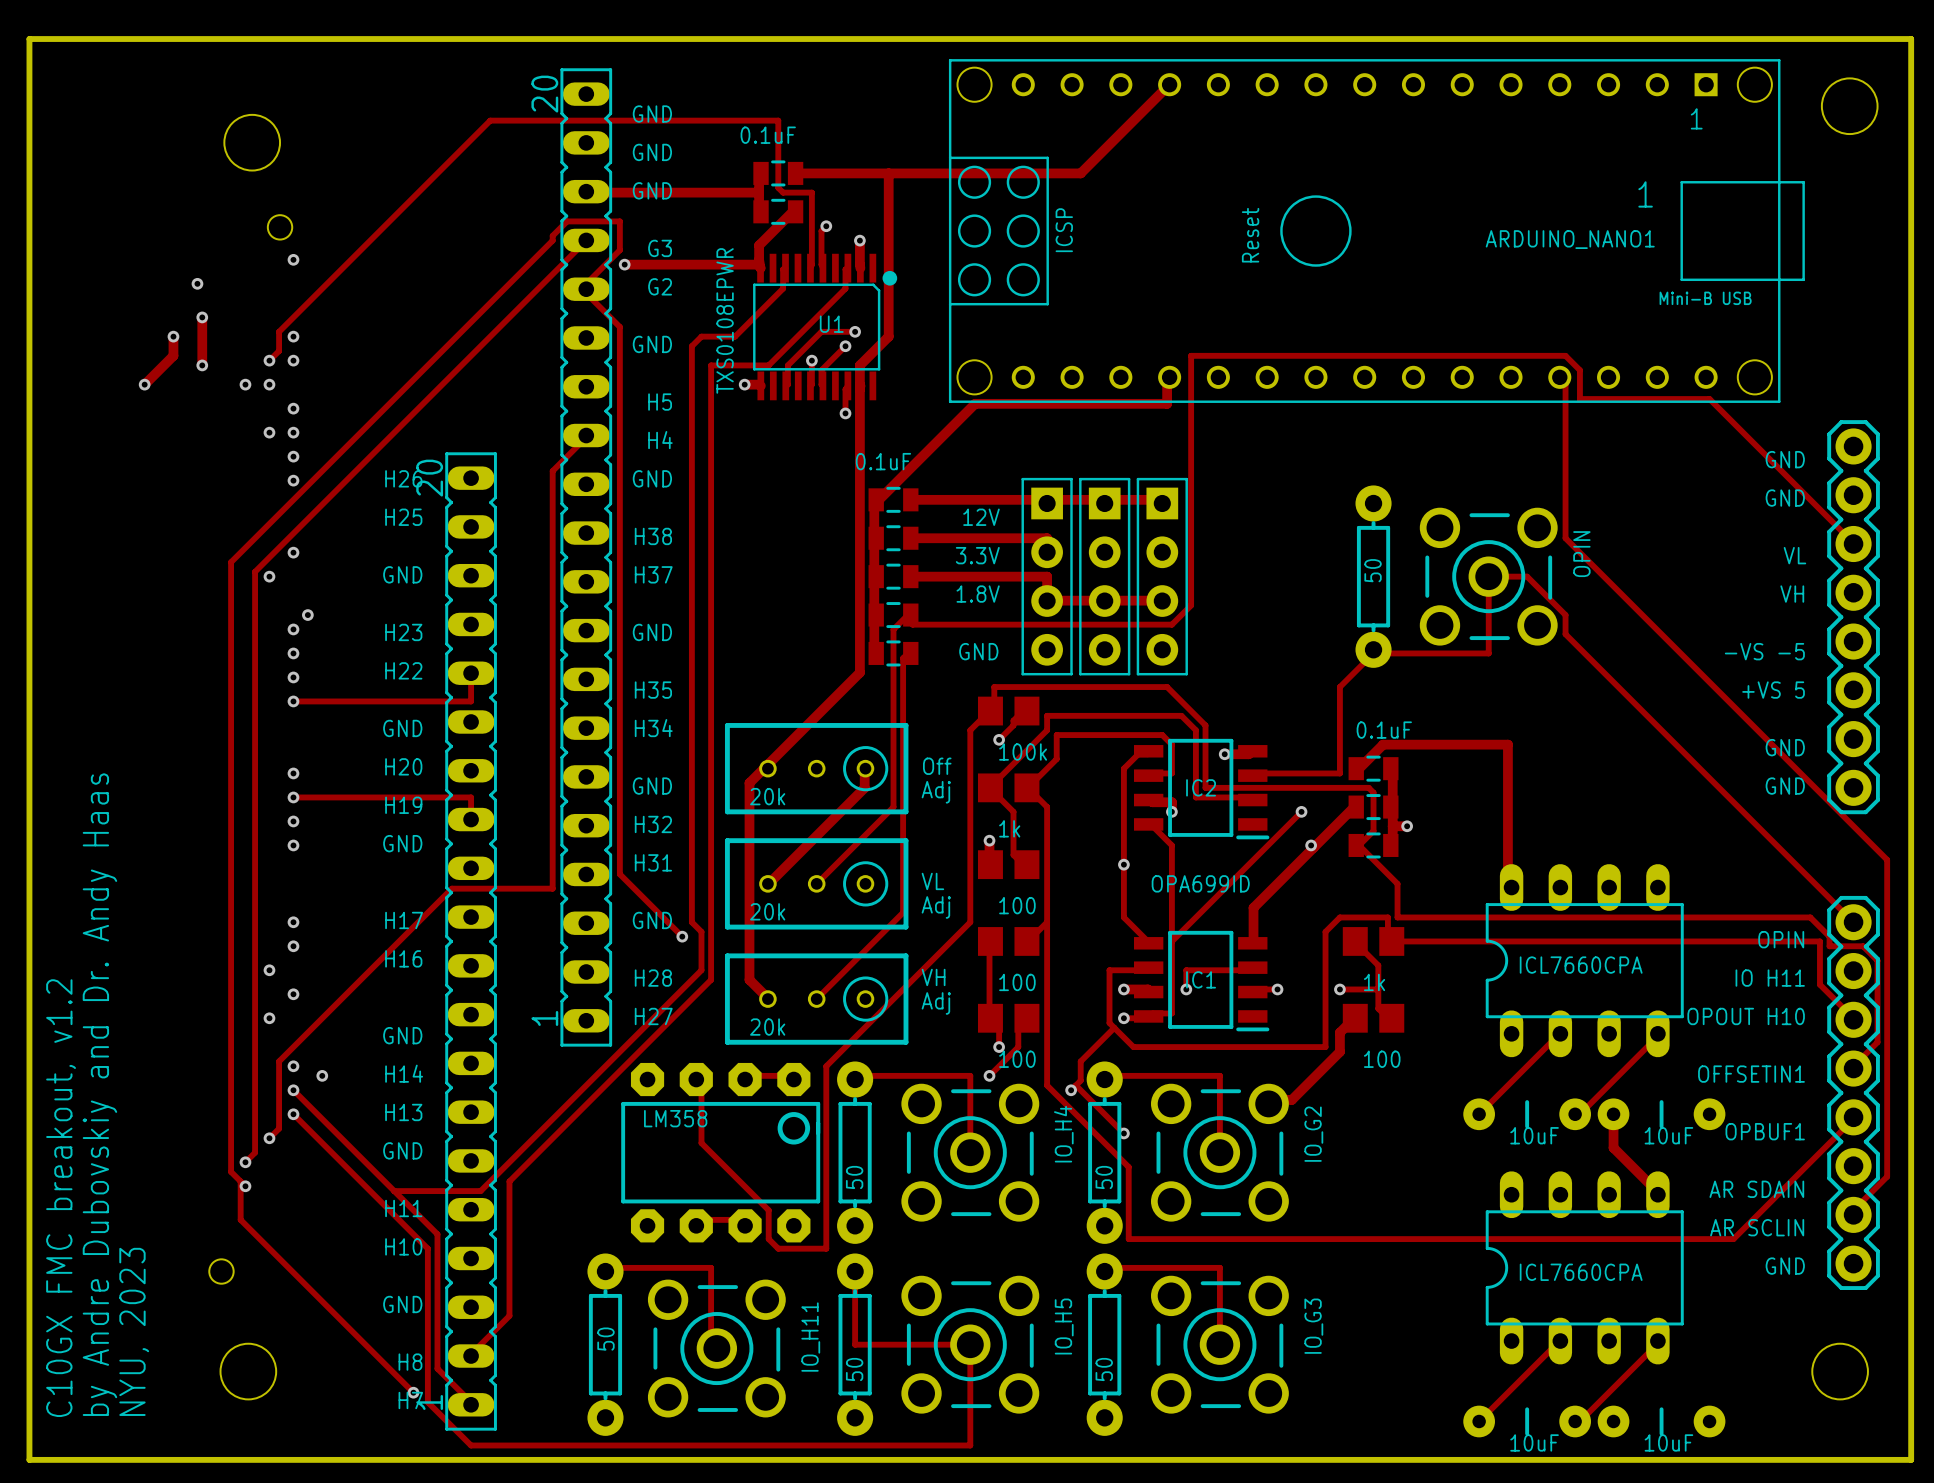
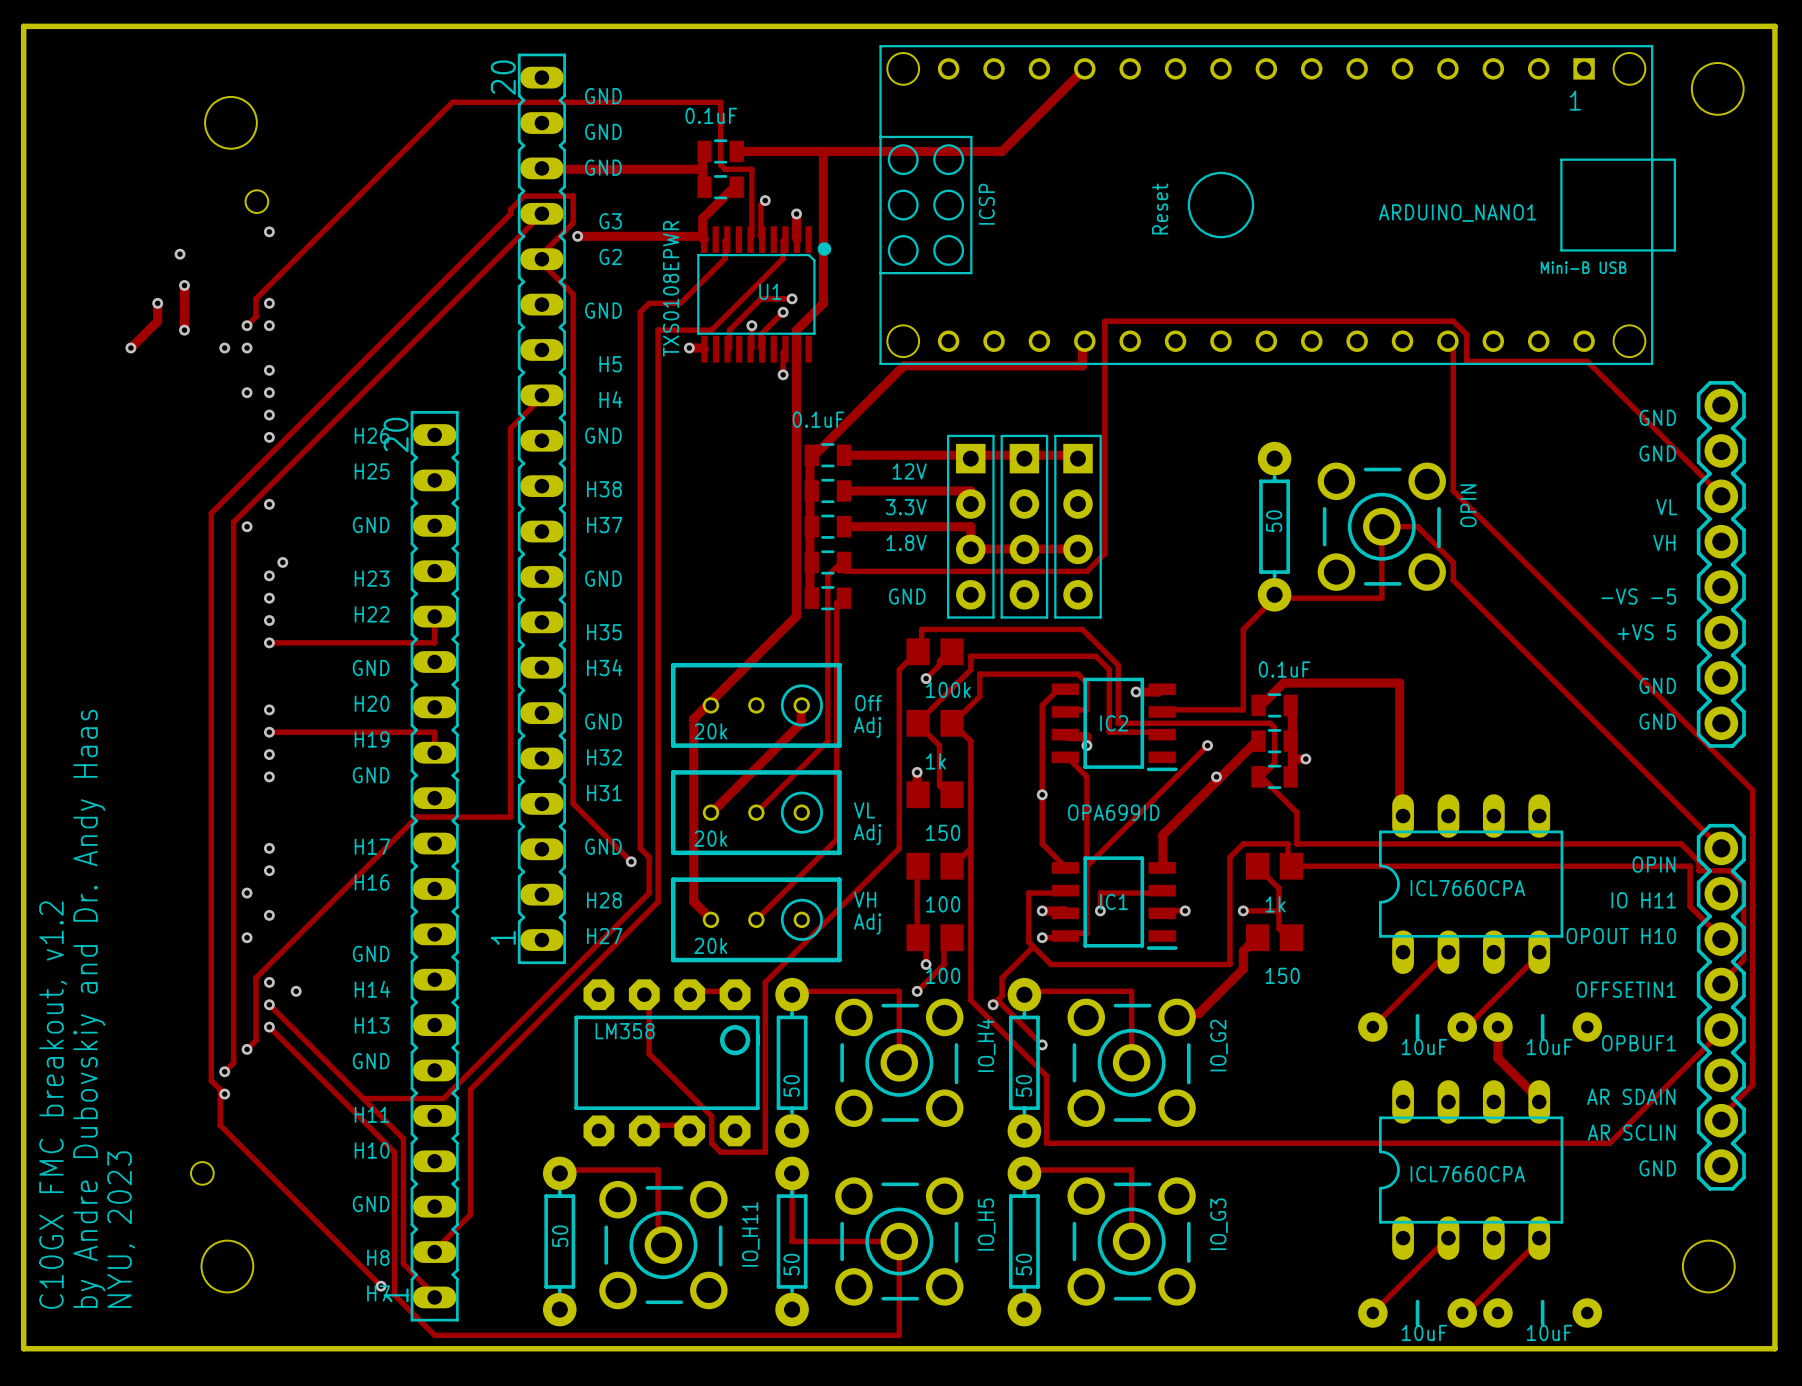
ARDUINO_NANO1 value: 1 (1645, 194) -> none
part value: 100 (1017, 905) -> 150 (943, 832)
part value: 100 (1382, 1059) -> 150 (1282, 975)

